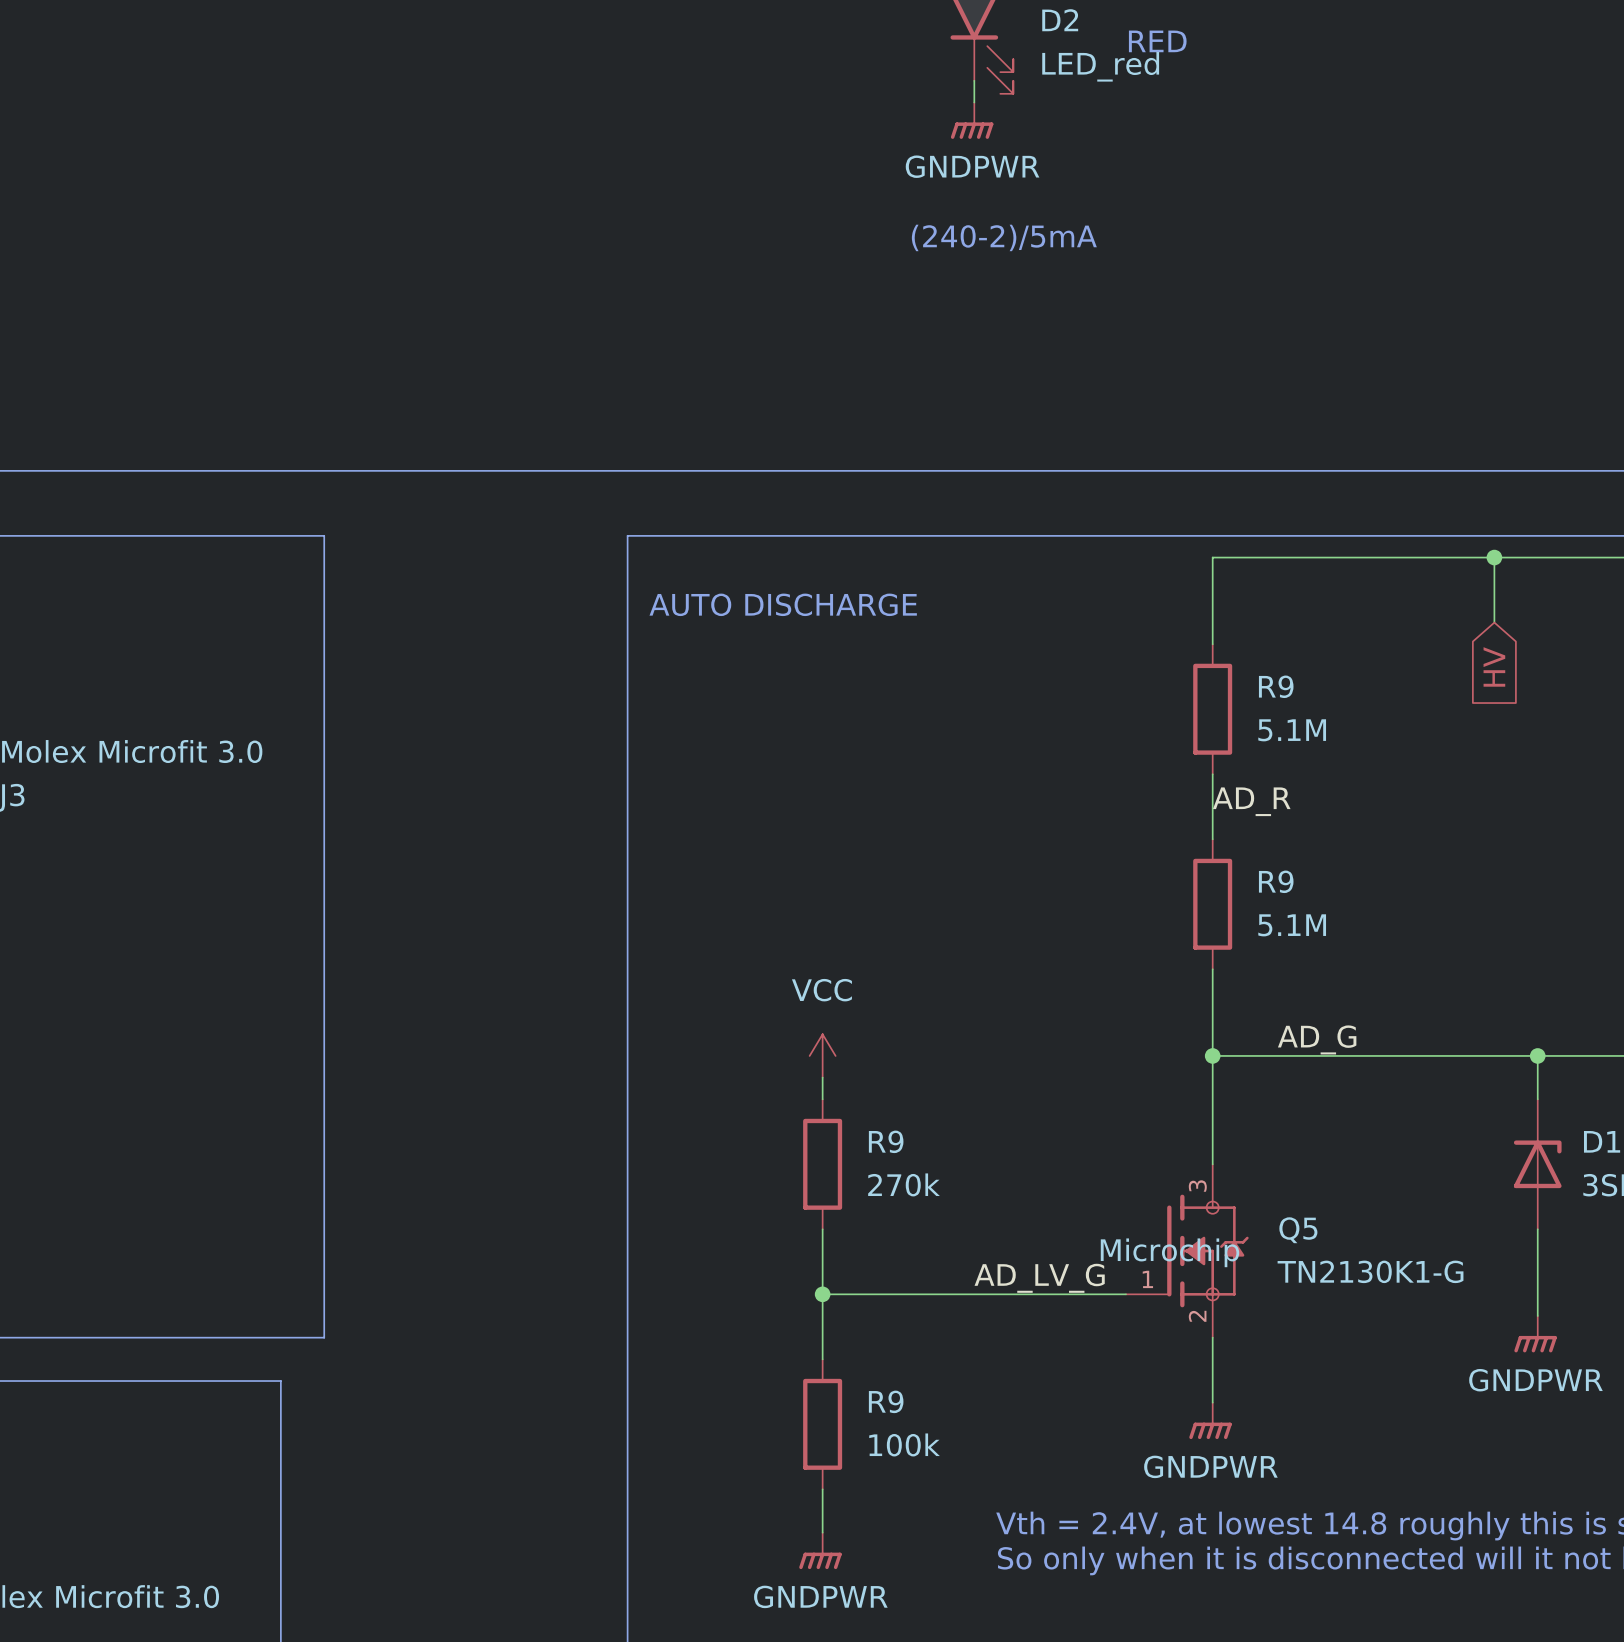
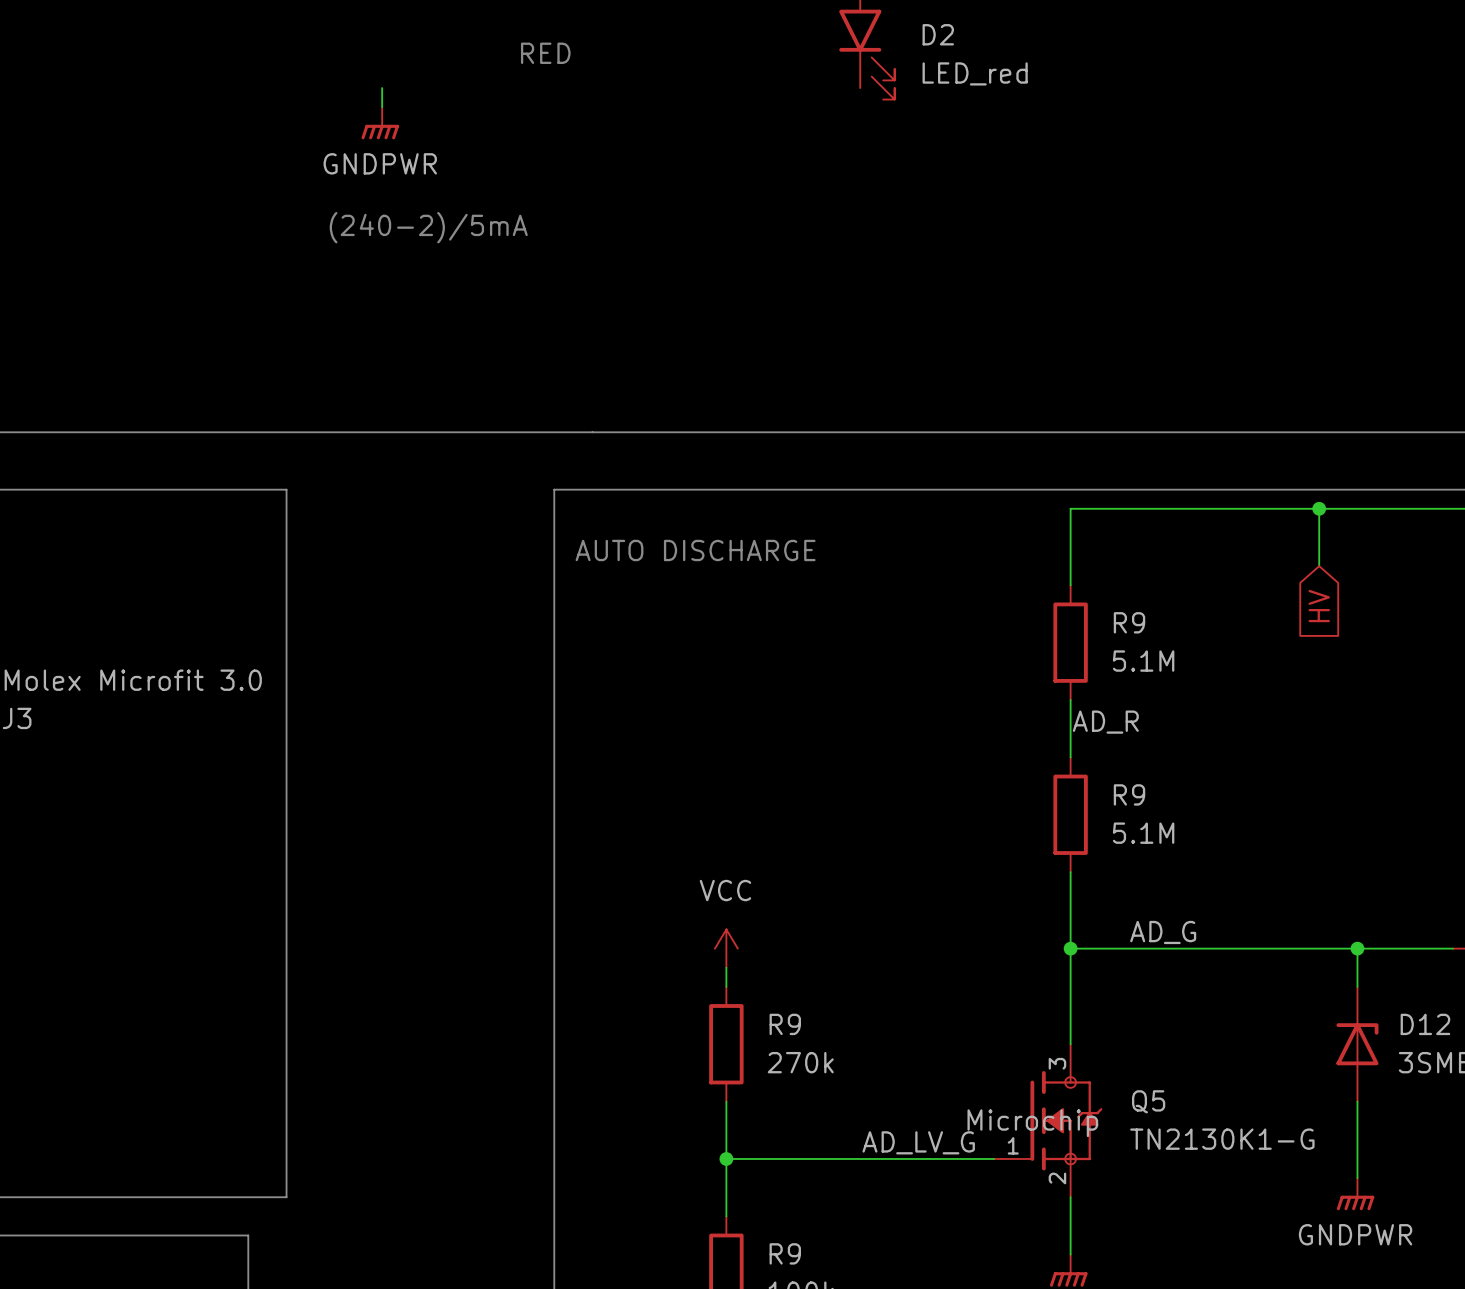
text: none -> RED (545, 53)
text: RED (1157, 41) -> none
wire: none -> (382, 88) (382, 107)
wire: (974, 80) (974, 102) -> none
power symbol: none -> GNDPWR (380, 123)
power symbol: GNDPWR (972, 120) -> none
text: none -> (240-2)/5mA (428, 227)
text: (240-2)/5mA (1004, 237) -> none

